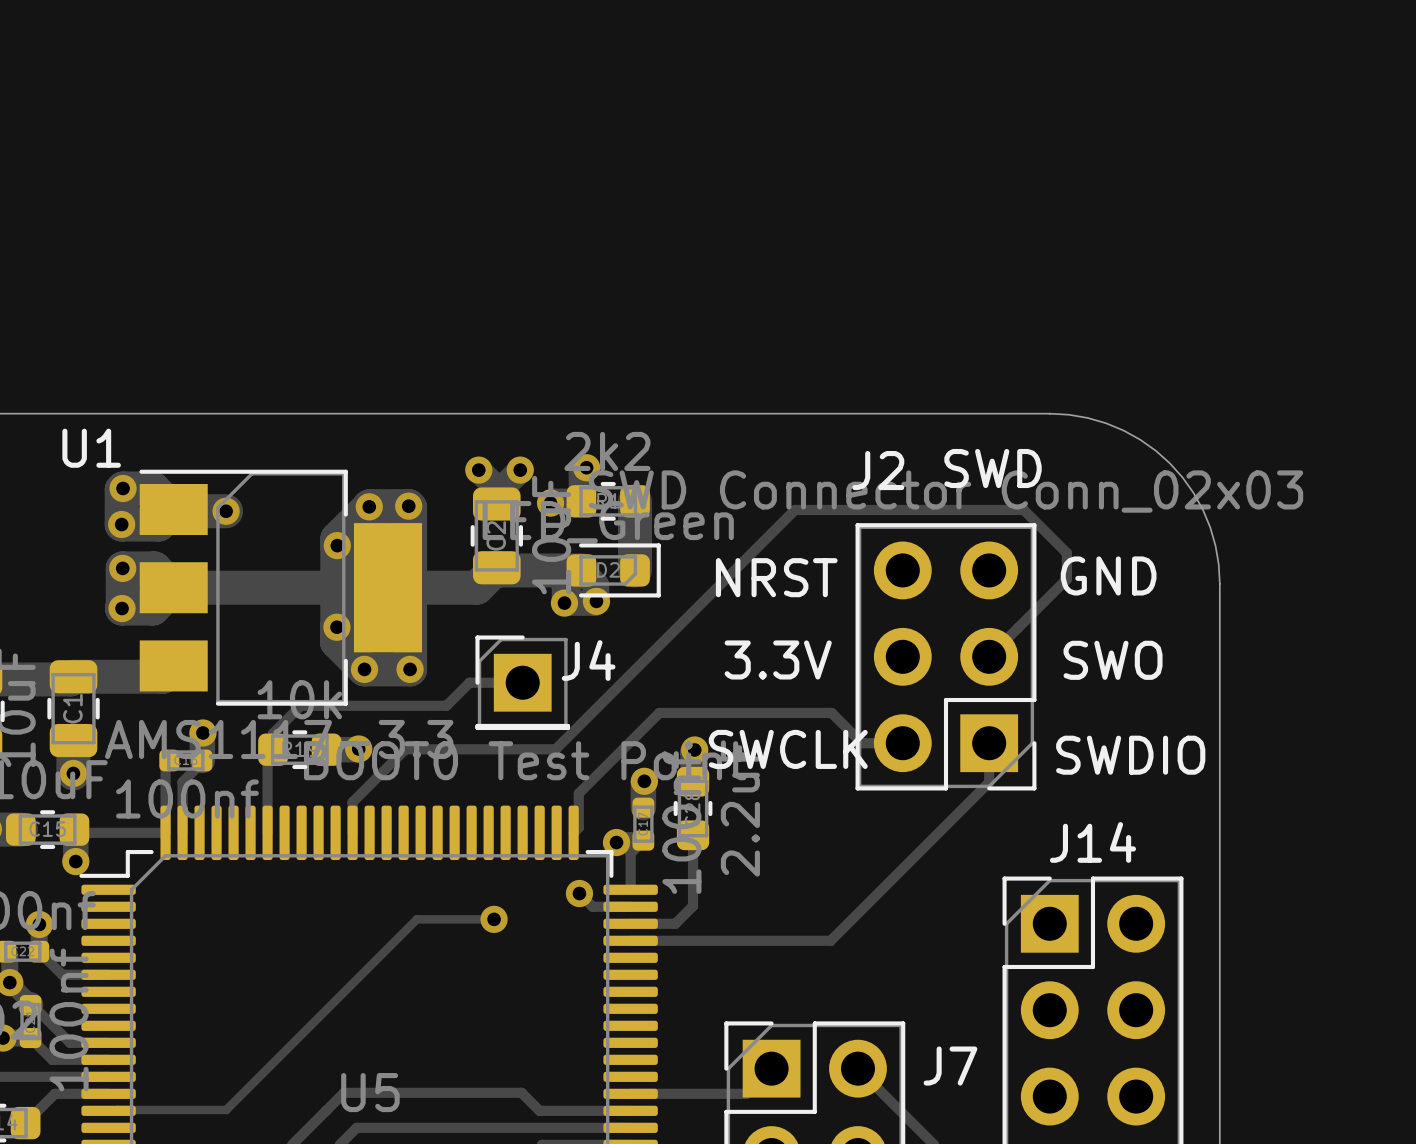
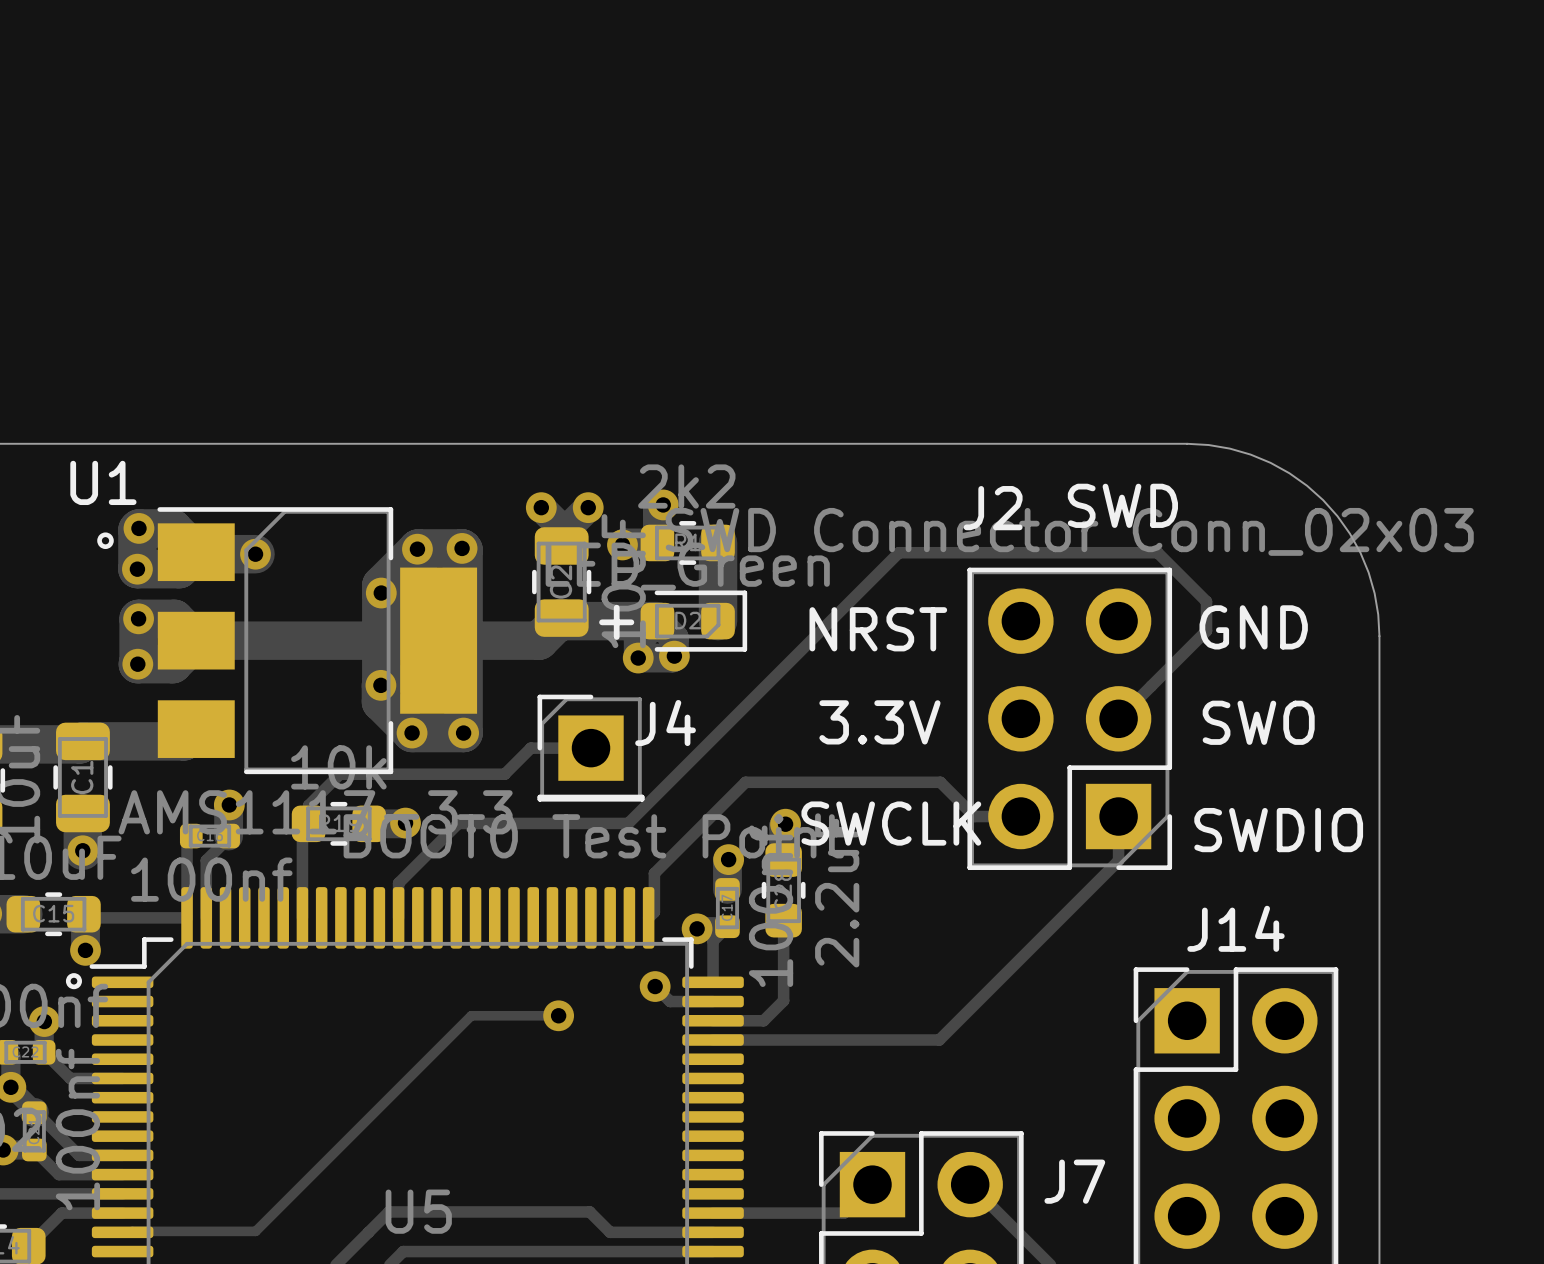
drawing: none -> [97, 532, 114, 550]
text: none -> + (616, 622)
drawing: none -> [65, 973, 82, 990]

